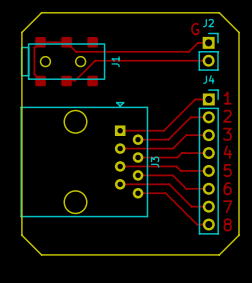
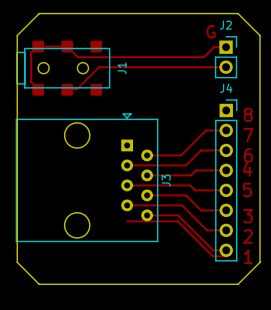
text position: 1 (227, 98) -> 1 (248, 256)
top track: (208, 99) (195, 99) (163, 130) (120, 130) -> none
text position: 2 (227, 116) -> 2 (248, 236)
text position: 3 (227, 134) -> 3 (248, 216)
text position: 6 (227, 188) -> 6 (248, 155)
top track: none -> (127, 221) (177, 221) (212, 256) (226, 256)
text position: 7 (227, 206) -> 7 (248, 135)
text position: 8 (227, 224) -> 8 (248, 114)

